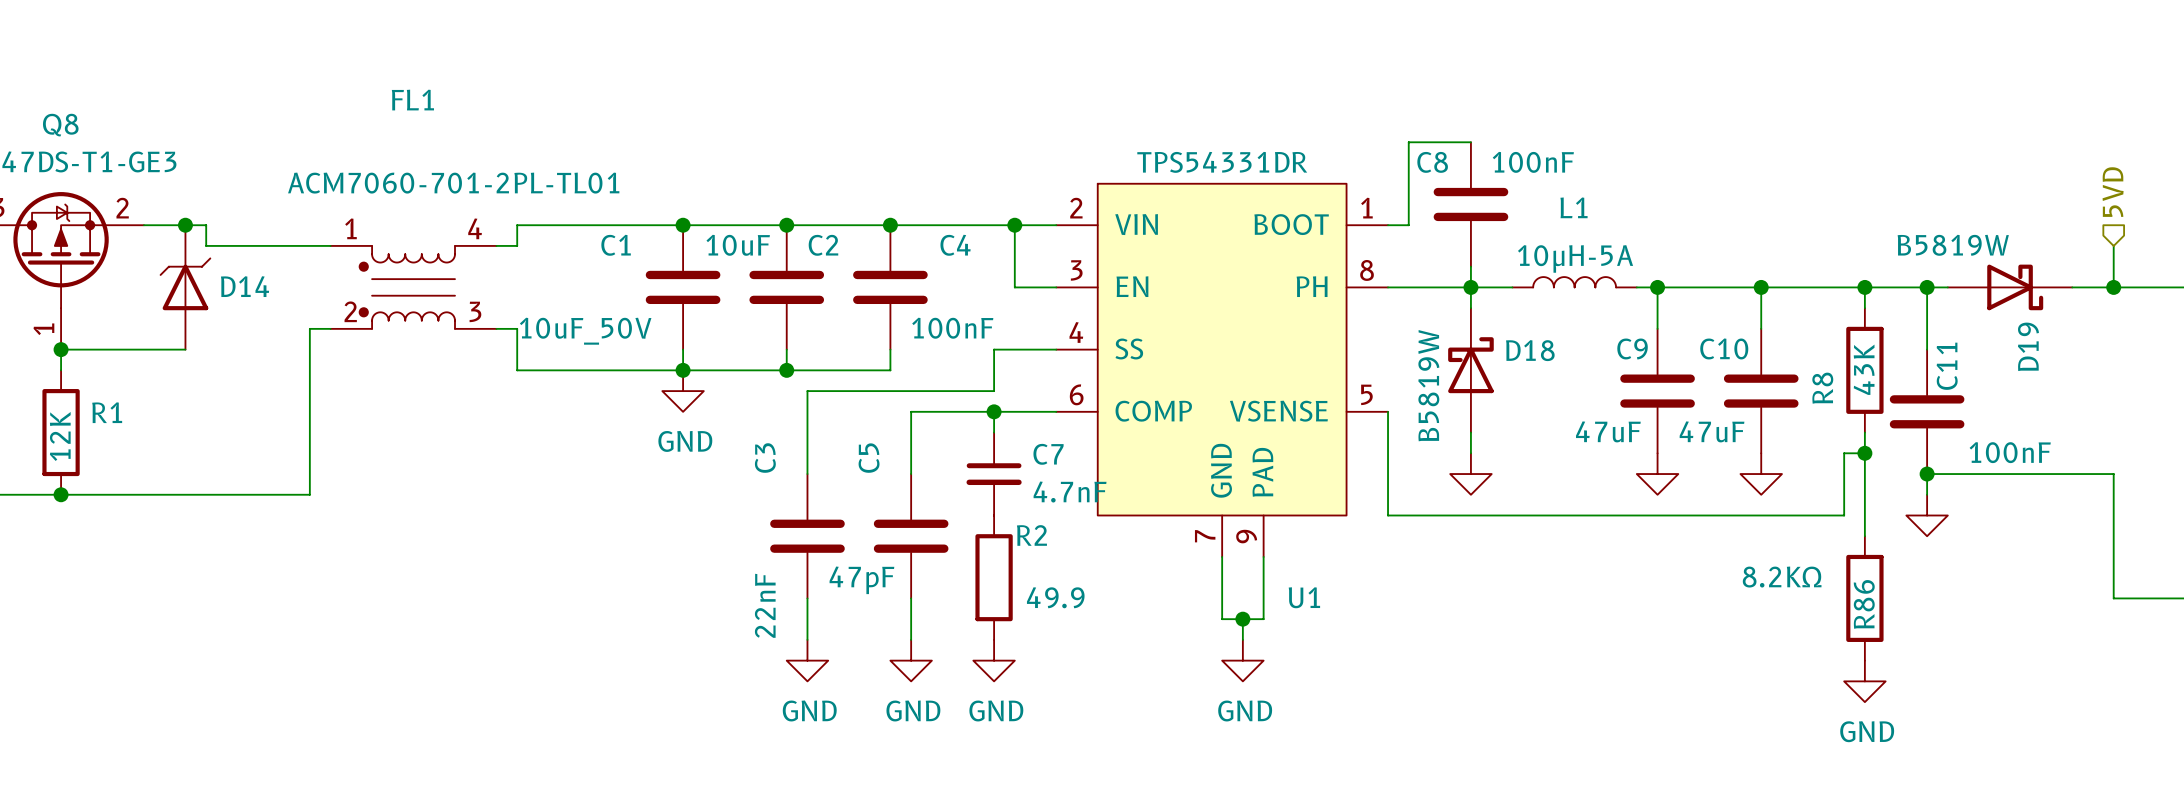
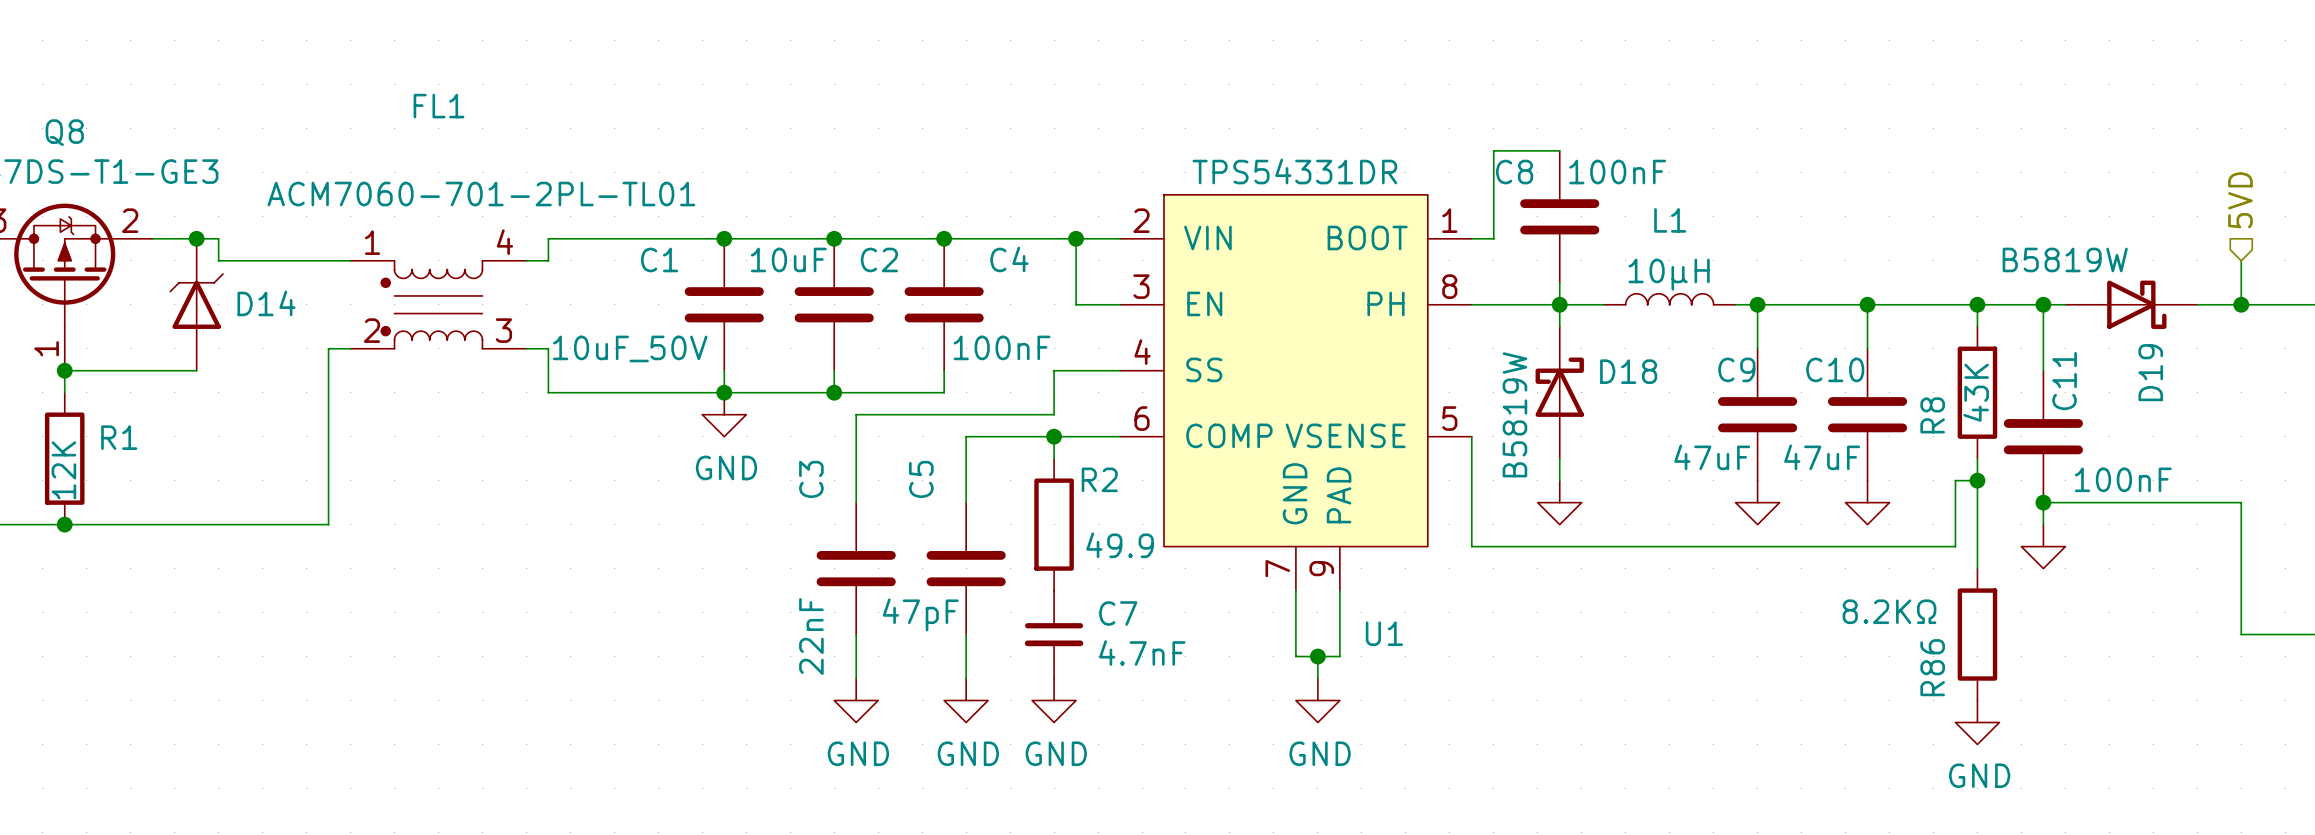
L1 value: 10μH-5A (1575, 258) -> 10μH (1669, 274)
C7 position: (994, 474) -> (1054, 634)
R2 position: (994, 577) -> (1054, 524)
R86 name position: R86 (1864, 604) -> R86 (1932, 667)

